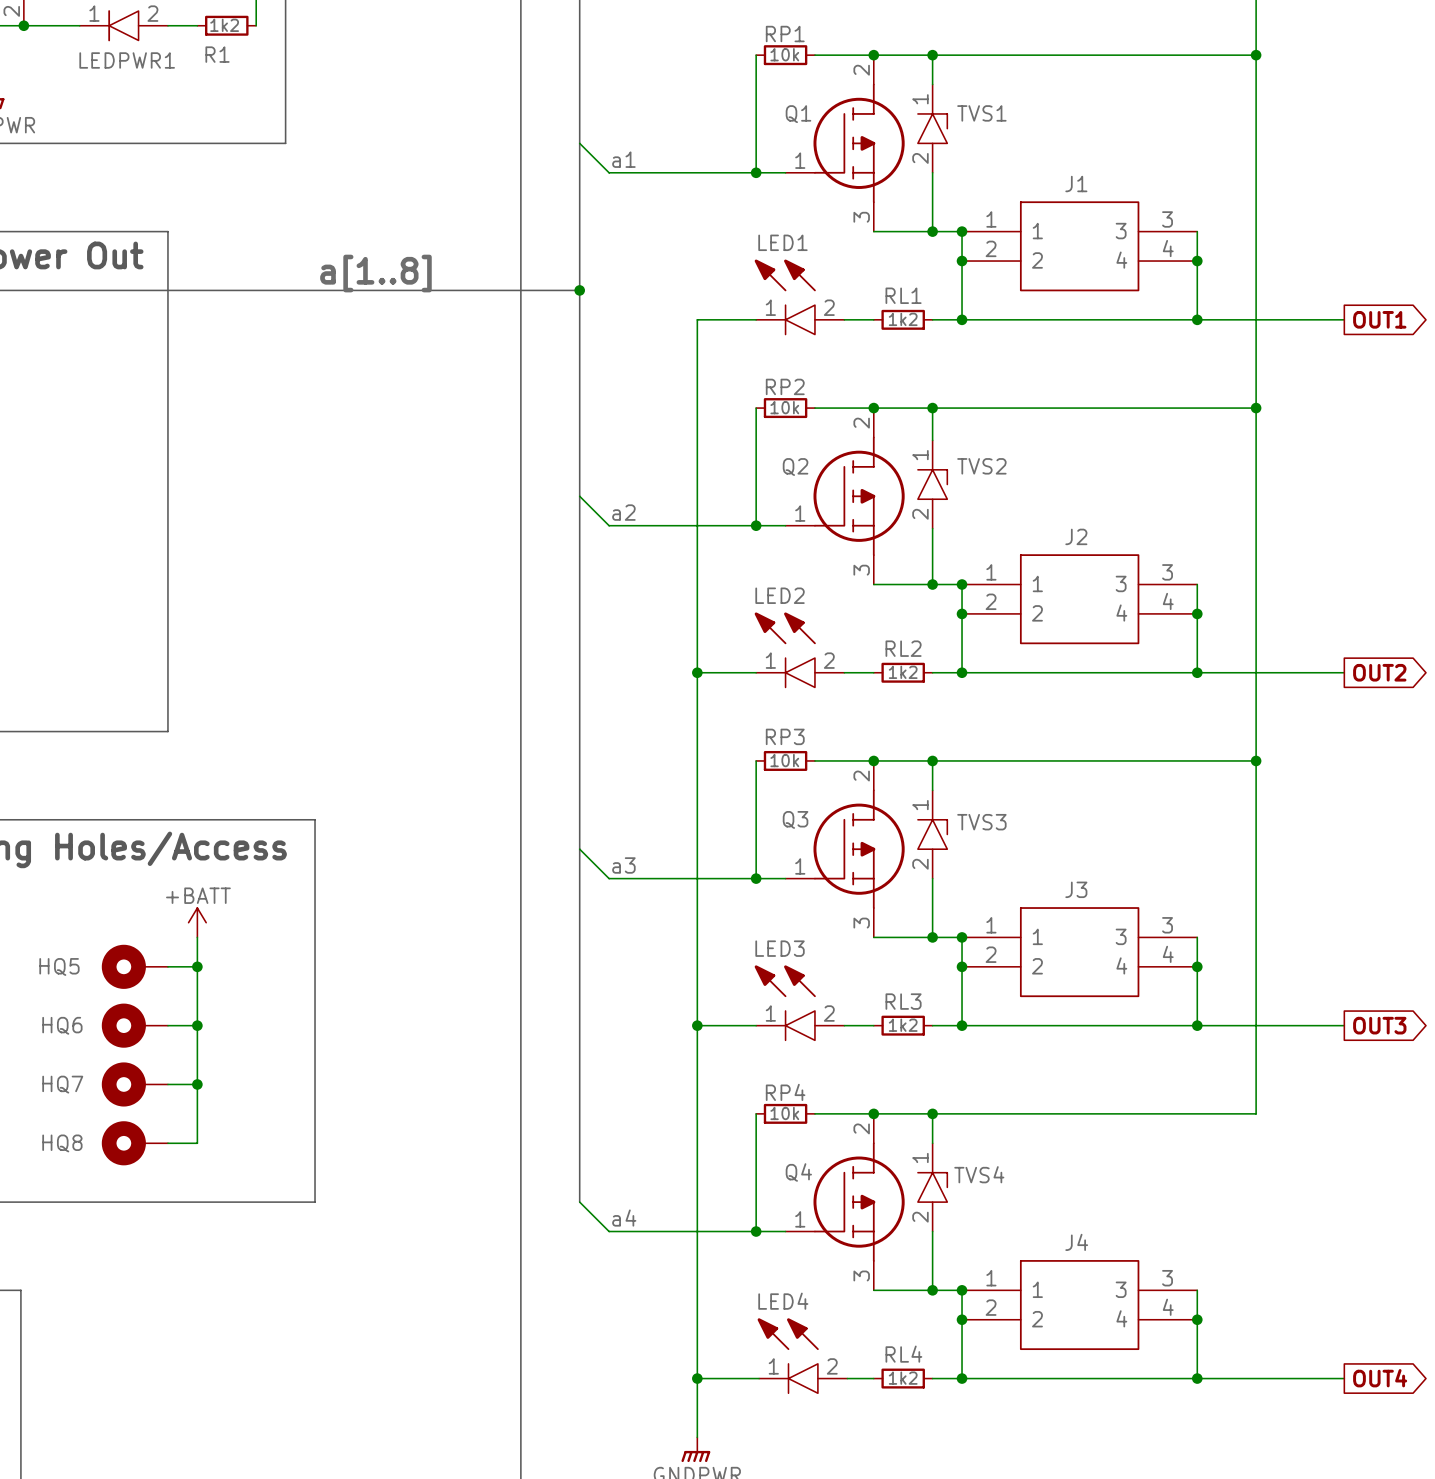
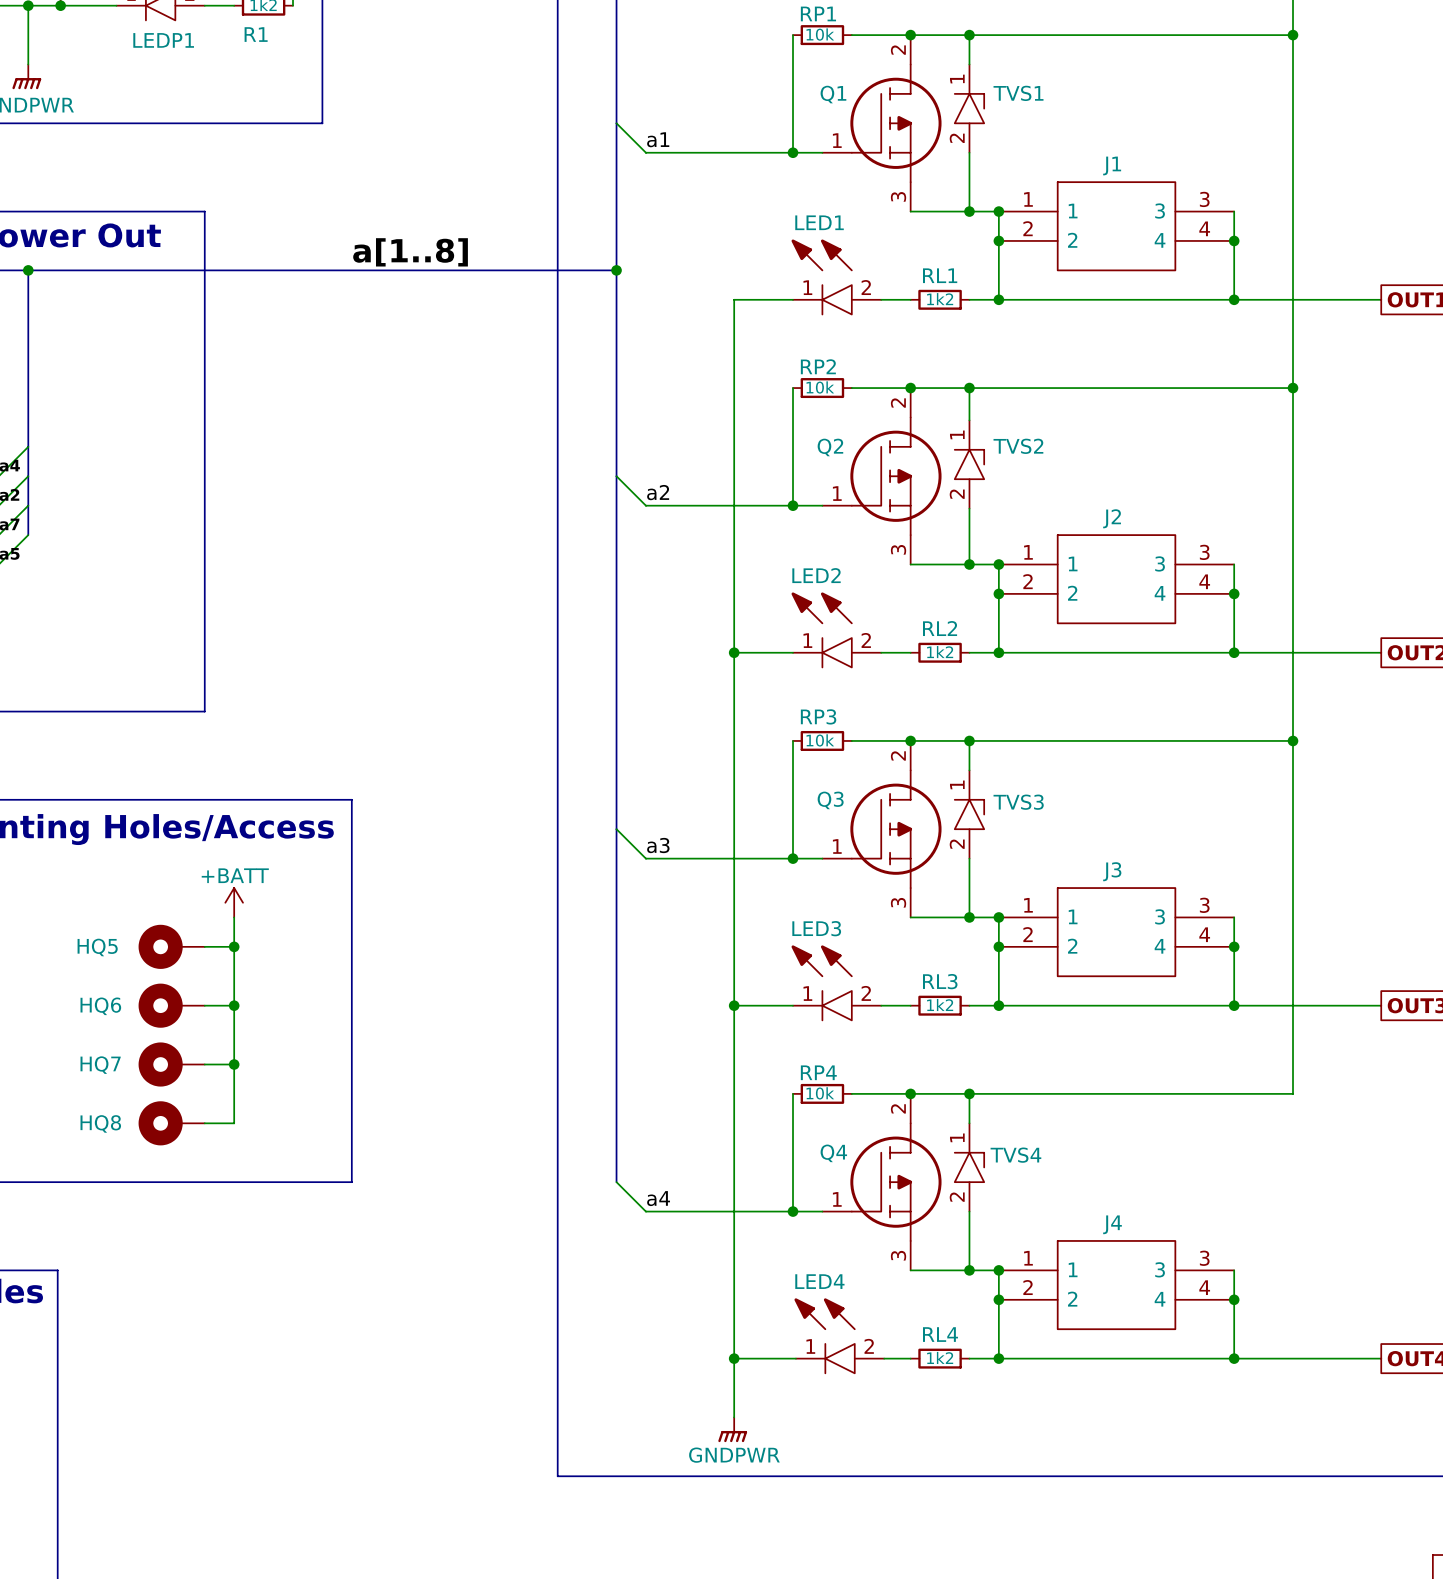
LEDPWR1 name: LEDPWR1 (127, 60) -> LEDP1 (163, 40)

